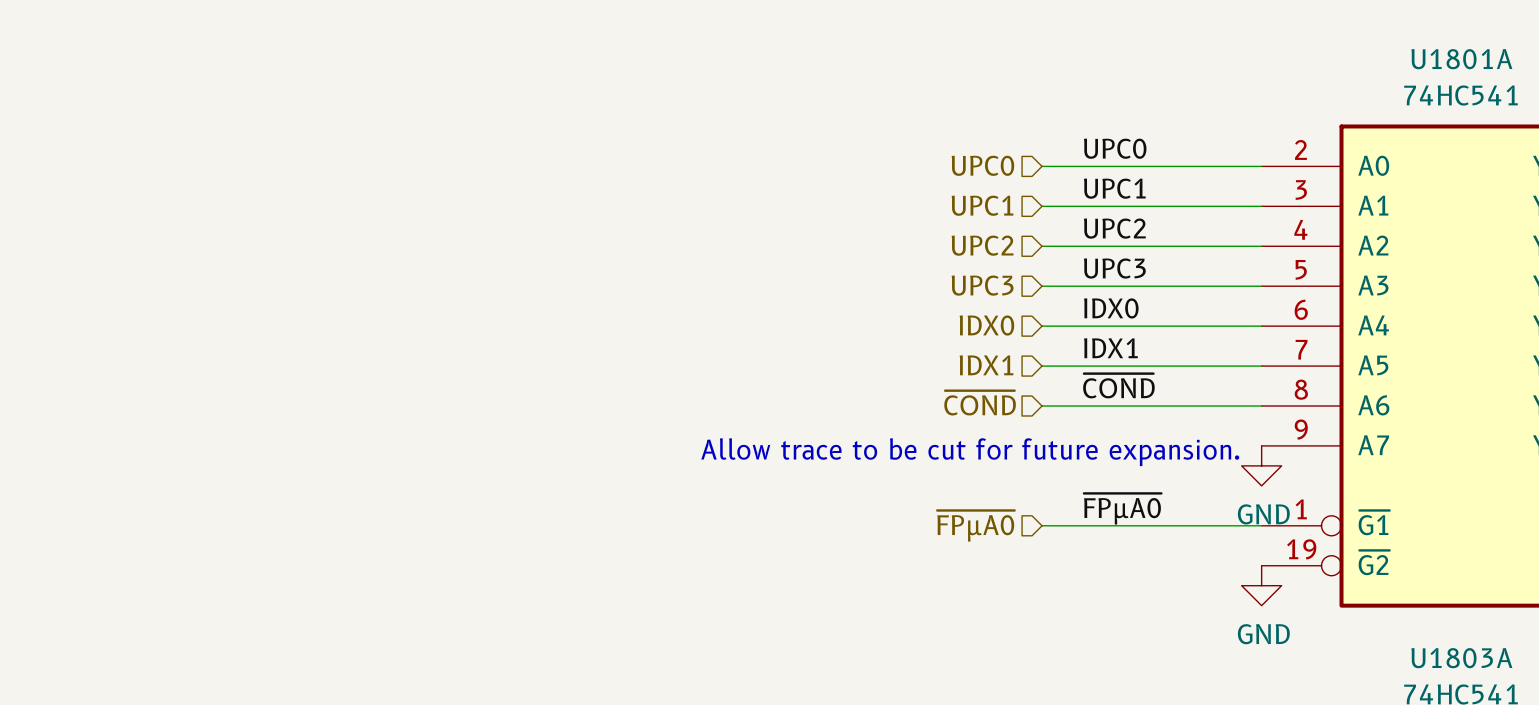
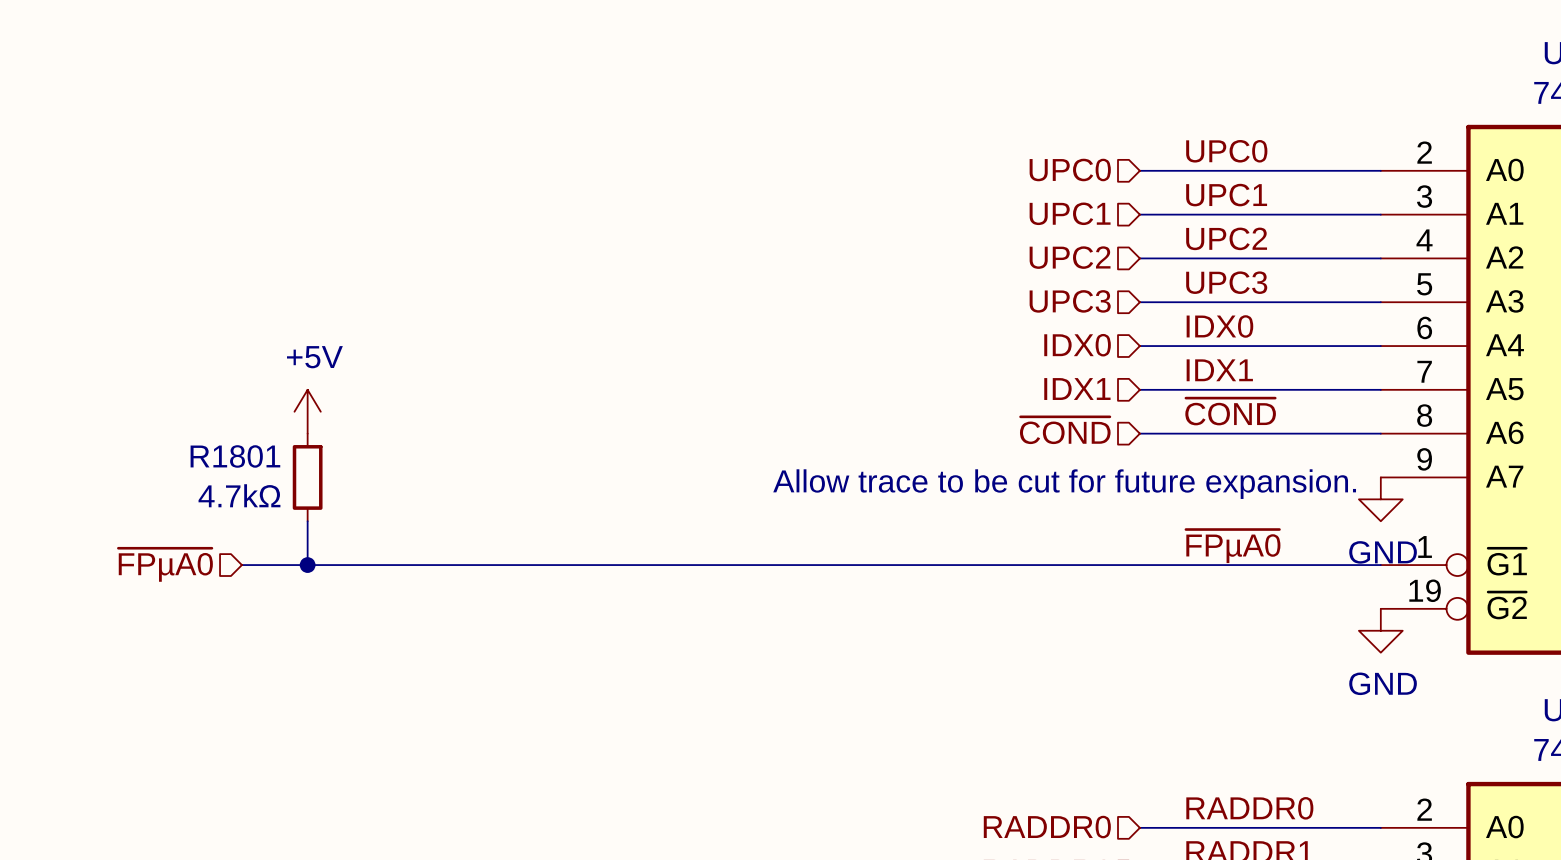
power symbol: none -> +5V (307, 411)
R1801: none -> 4.7kΩ (307, 477)
wire: none -> (307, 521) (307, 565)
wire: none -> (241, 565) (1139, 565)
junction: none -> (307, 565)
hierarchical label: none -> ~{FPµA0} (165, 565)
hierarchical label: ~{FPµA0} (975, 526) -> none

